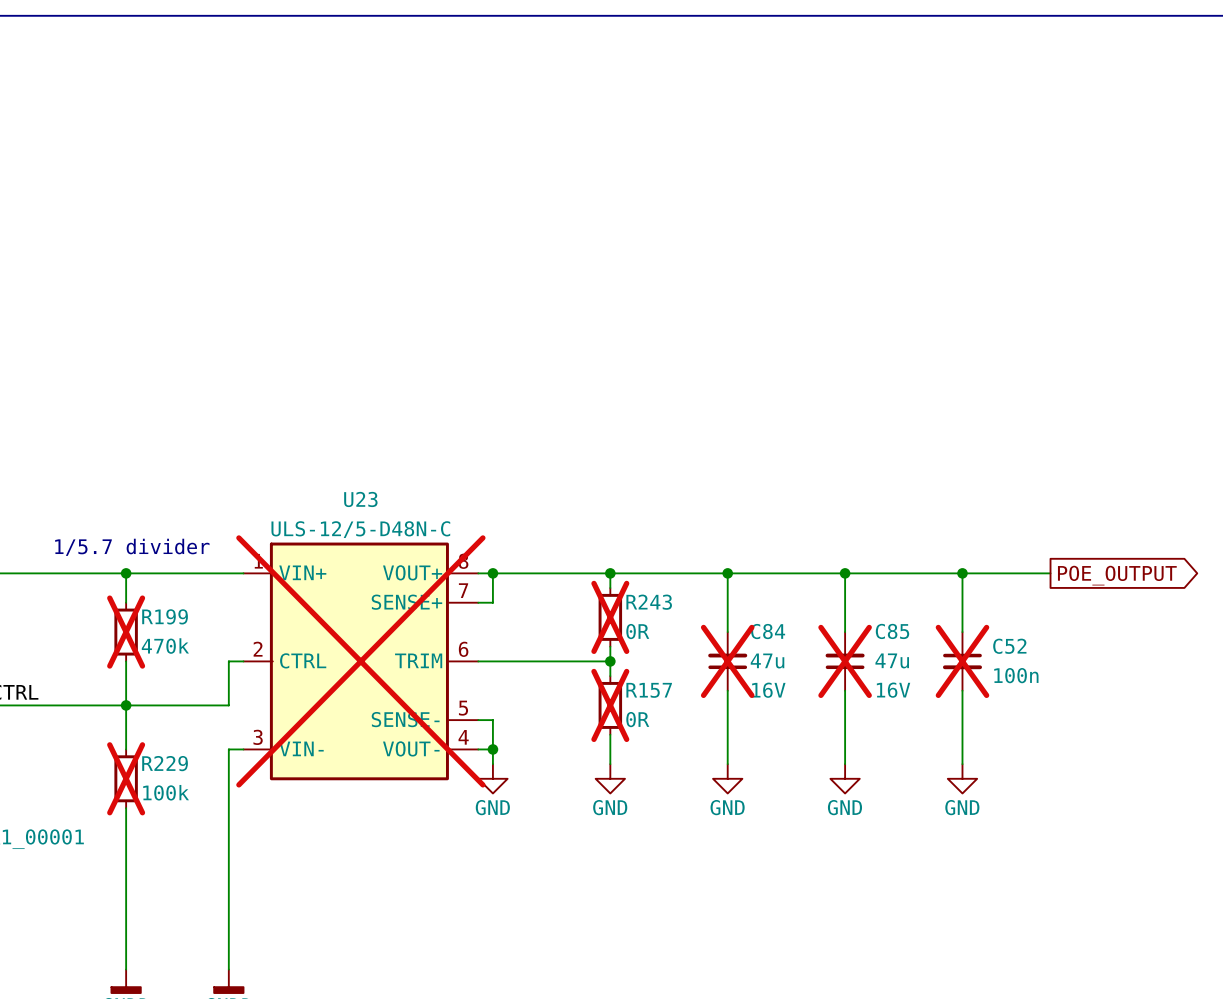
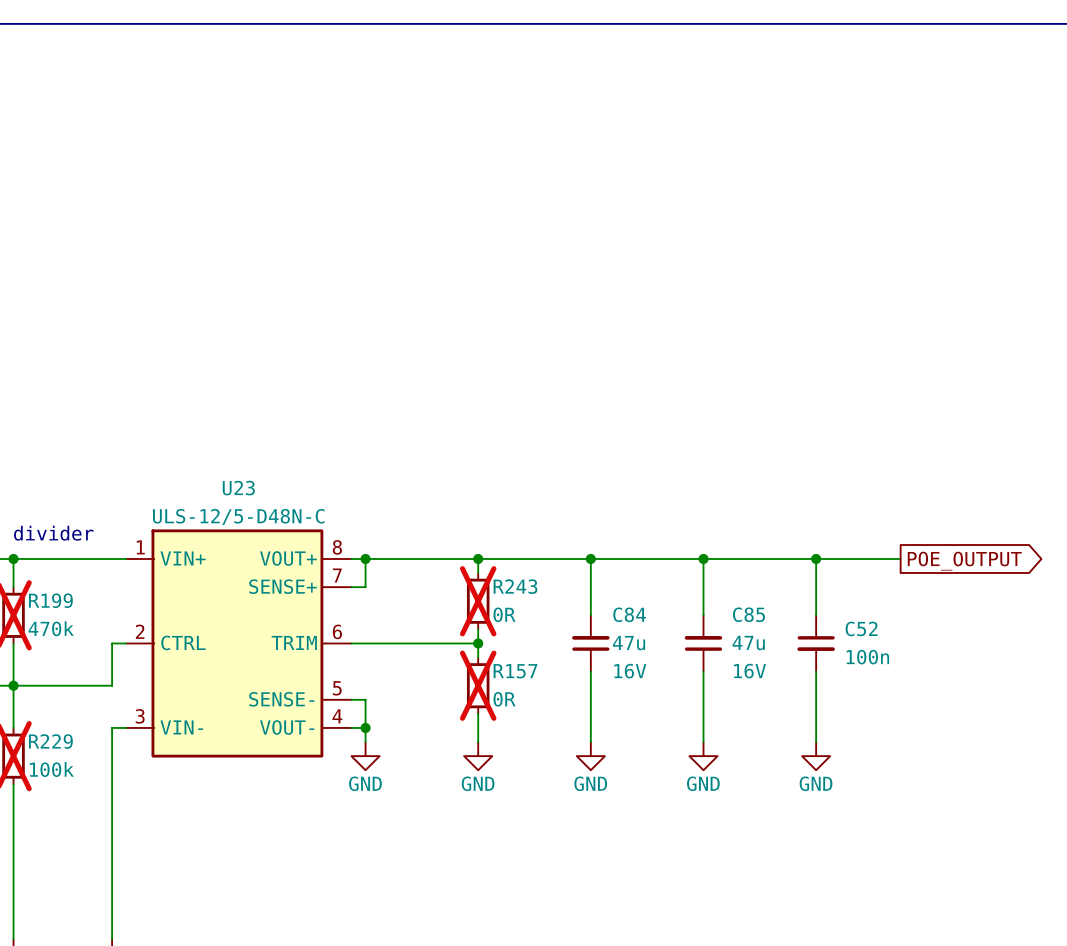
U23 do-not-place cross: (360, 661) -> none
C84 do-not-place cross: (727, 661) -> none
C85 do-not-place cross: (845, 661) -> none
C52 do-not-place cross: (962, 661) -> none

